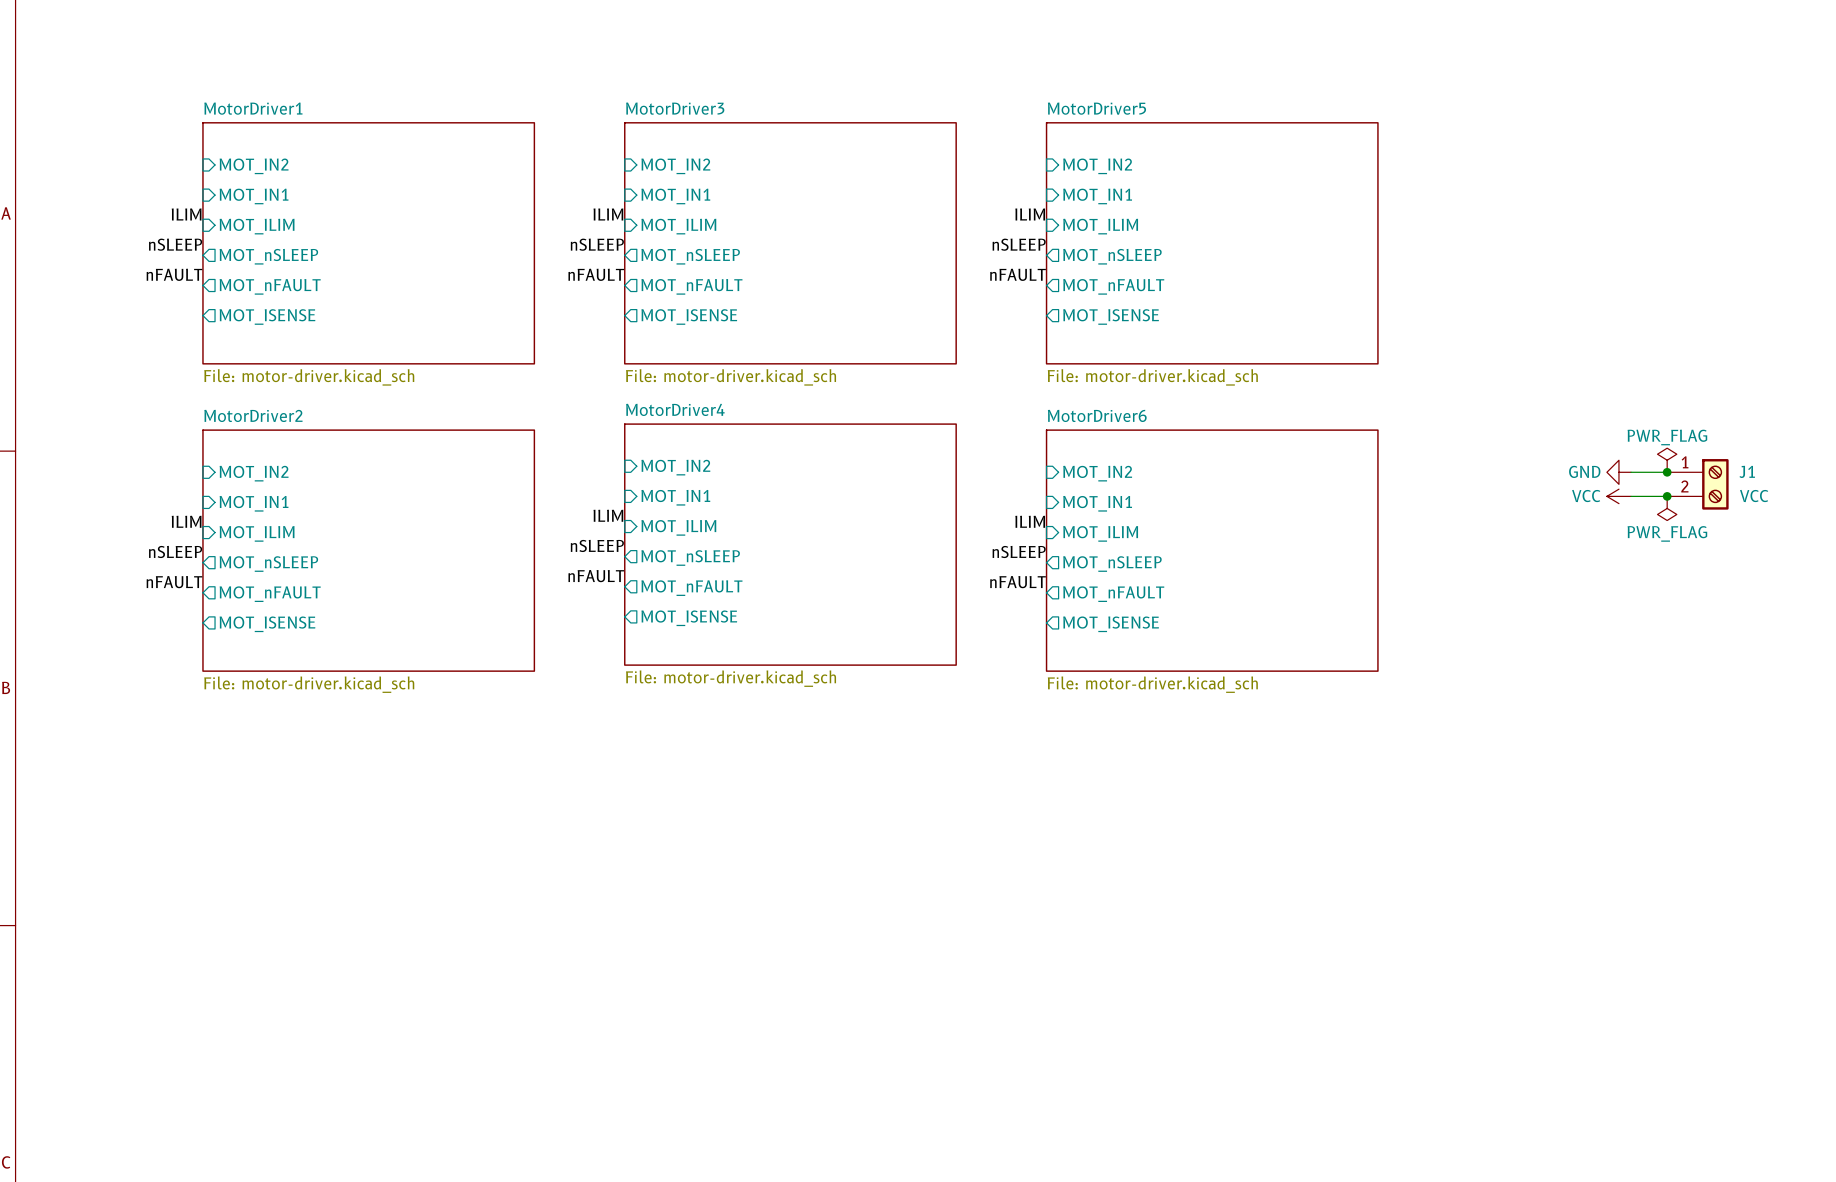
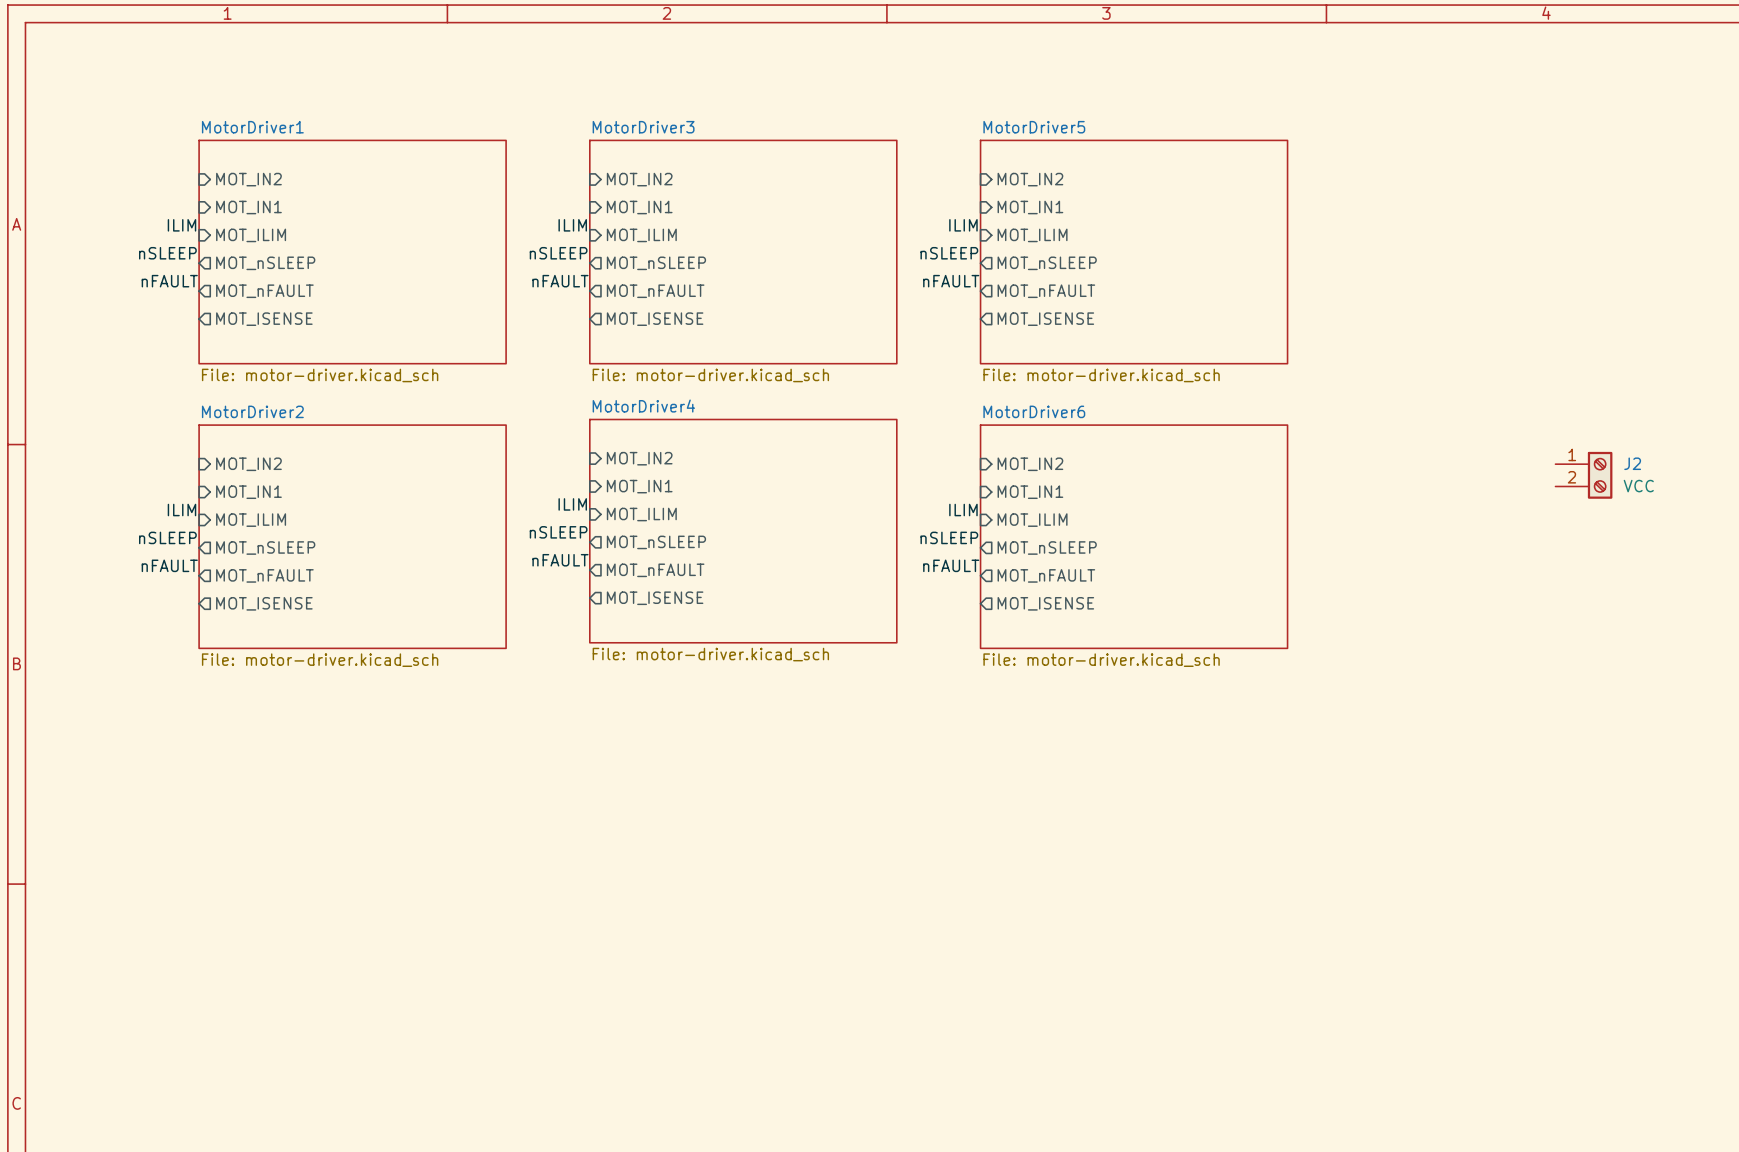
power symbol: PWR_FLAG (1667, 460) -> none
J1 name: J1 (1747, 471) -> J2 (1632, 463)
power symbol: GND (1618, 472) -> none
wire: (1631, 472) (1667, 472) -> none
junction: (1667, 472) -> none
power symbol: VCC (1618, 496) -> none
wire: (1631, 496) (1667, 496) -> none
junction: (1667, 496) -> none
power symbol: PWR_FLAG (1667, 508) -> none

